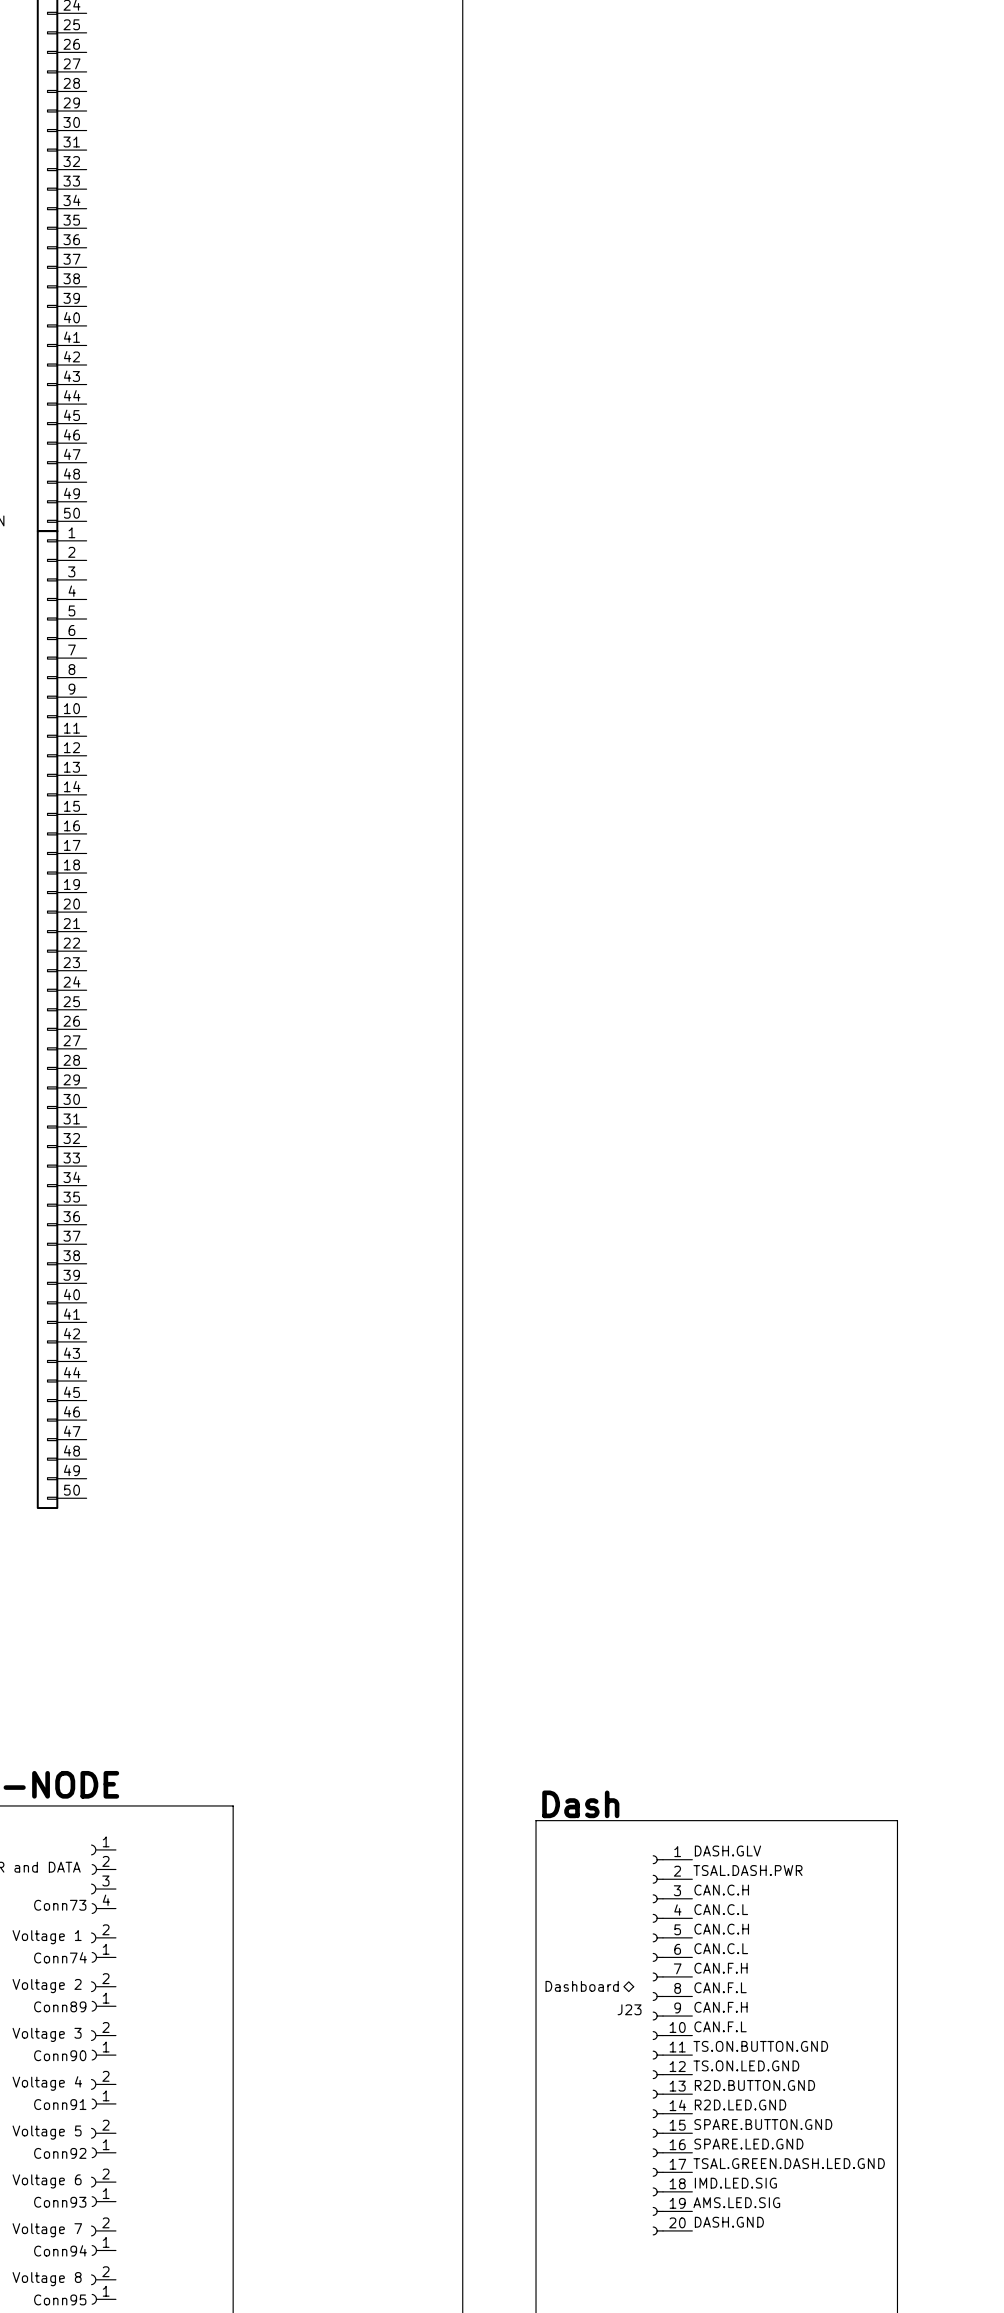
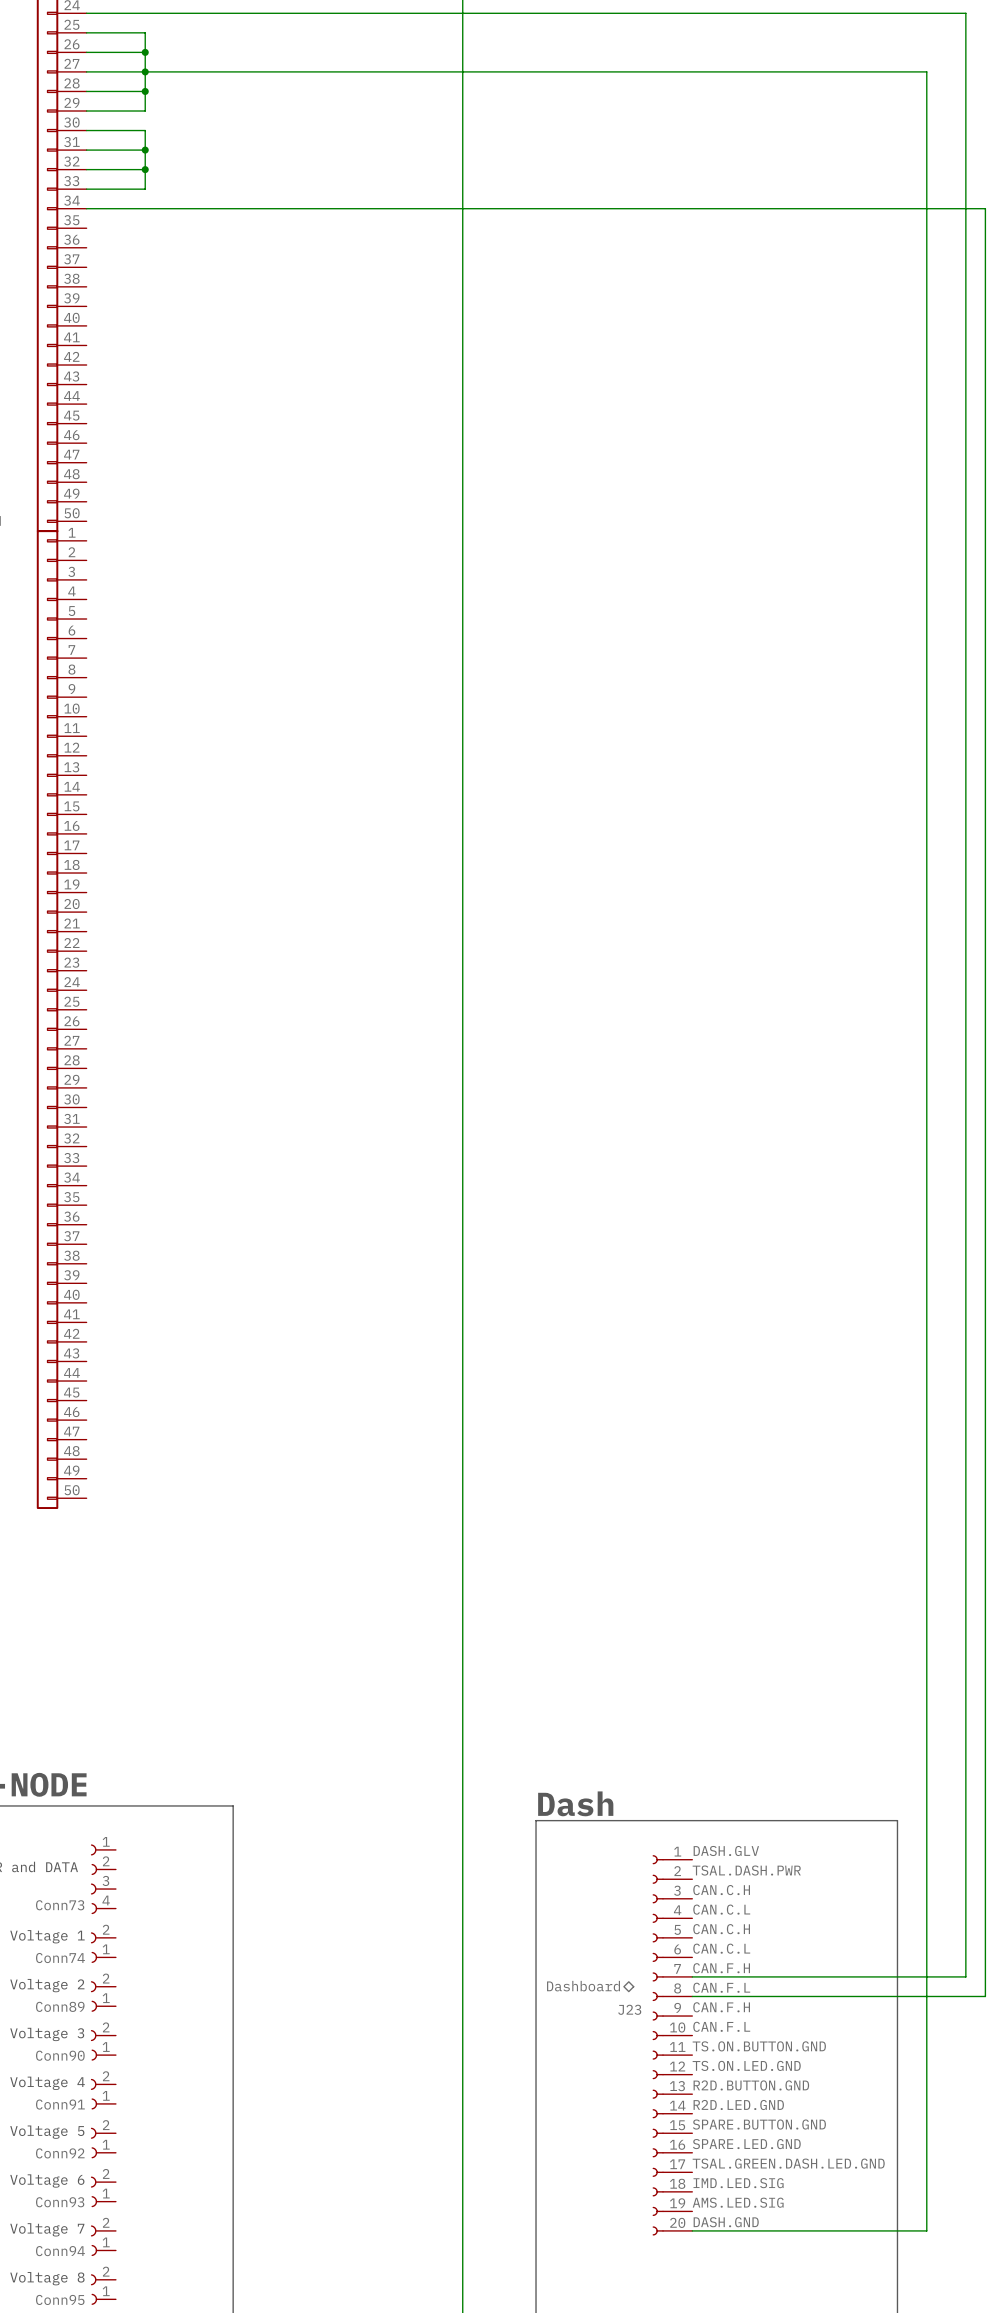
wire: none -> (86, 13) (965, 13) (965, 1976) (692, 1976)
wire: none -> (86, 32) (145, 32) (145, 111) (86, 111)
wire: none -> (86, 52) (145, 52)
junction: none -> (145, 52)
wire: none -> (86, 71) (926, 71) (926, 2230) (692, 2230)
junction: none -> (145, 71)
wire: none -> (86, 91) (145, 91)
junction: none -> (145, 91)
wire: none -> (86, 130) (145, 130) (145, 189) (86, 189)
wire: none -> (86, 150) (145, 150)
junction: none -> (145, 150)
wire: none -> (86, 169) (145, 169)
junction: none -> (145, 169)
wire: none -> (86, 208) (985, 208) (985, 1996) (692, 1996)

